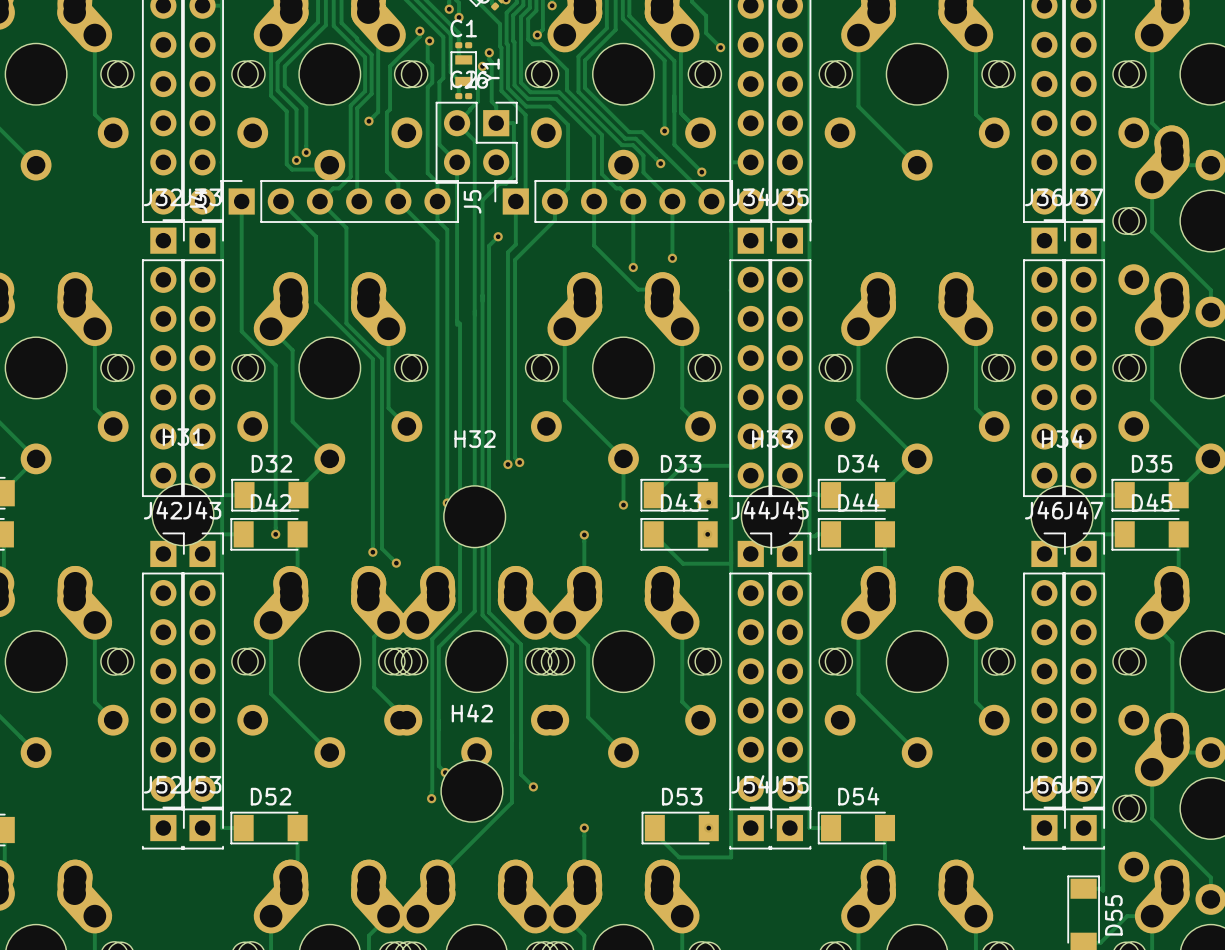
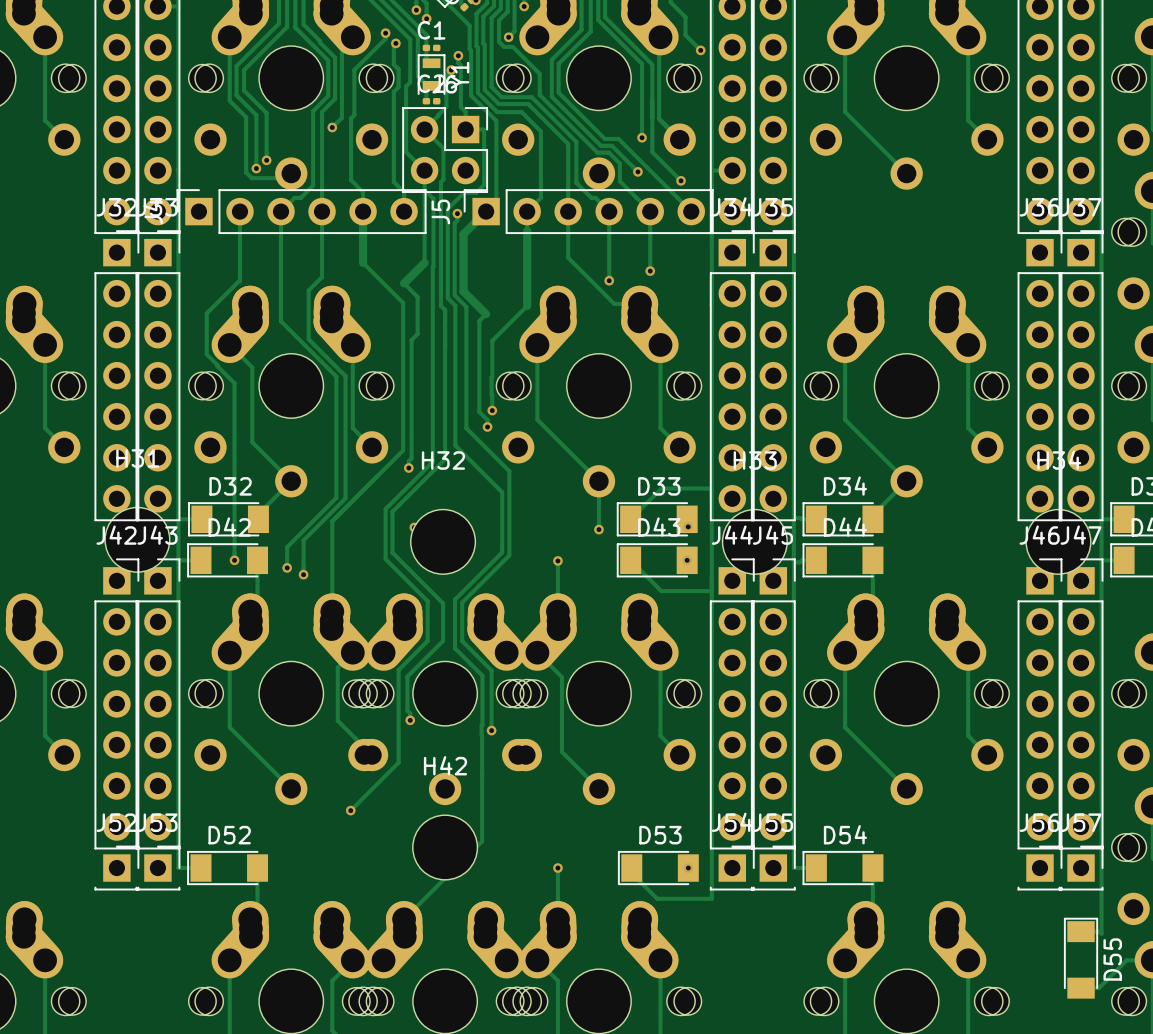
track: (359, 106) (357, 108) (357, 199) (359, 201) -> (322, 111) (322, 277) (308, 290)
track: (474, 140) (474, 575) -> (443, 148) (443, 179) (440, 182) (440, 305) (445, 310) (445, 459) (392, 511) (392, 552) (443, 603)
track: (506, 183) (499, 183) (482, 200) (482, 615) (511, 644) (511, 701) -> (476, 192) (464, 192) (447, 209) (447, 298) (455, 305) (455, 445) (502, 492) (502, 552) (455, 599) (455, 648) (482, 675) (482, 735)
track: (241, 201) (241, 331) (259, 349) -> (239, 211) (239, 280) (206, 313) (206, 354) (217, 366)
track: (280, 201) (316, 236) (316, 302) (320, 306) -> (281, 211) (281, 321)
track: (320, 201) (346, 227) (346, 276) -> none
track: (398, 201) (437, 240) (437, 583) -> (363, 211) (363, 262) (403, 302) (403, 450) (332, 521) (332, 611)
track: (437, 201) (437, 220) (447, 229) (447, 503) -> none
track: (515, 201) (515, 244) (507, 252) (507, 464) -> (486, 211) (463, 234) (463, 291) (486, 314) (479, 320) (479, 411) (487, 420) (487, 426)
track: (554, 220) (515, 259) (515, 457) (519, 462) -> (527, 231) (527, 305) (492, 340) (492, 410)
track: (498, 236) (489, 245) (489, 612) (521, 644) -> (457, 213) (457, 220) (454, 223) (454, 295) (466, 306) (466, 428) (509, 471) (509, 555) (462, 602) (462, 641) (491, 670) (491, 675)
via position: (498, 236) -> (457, 213)
track: (457, 250) (457, 324) -> (424, 262) (404, 283) (417, 296) (417, 334) (411, 340) (411, 458) (408, 461) (408, 468)
track: (457, 320) (460, 323) (460, 573) -> (424, 189) (433, 198) (432, 461) (385, 509) (385, 559) (427, 601)
track: (381, 358) (382, 548) (396, 563) -> (345, 376) (345, 498) (303, 540) (303, 574)
via: none -> (492, 410)
via: none -> (487, 426)
via: none -> (408, 468)
via: (519, 462) -> none
via: (507, 464) -> none
track: (372, 474) (372, 552) -> (336, 497) (287, 547) (287, 567)
via: none -> (287, 567)
via: none -> (303, 574)
via: (372, 552) -> none
via: (396, 563) -> none
track: (440, 645) (438, 647) (438, 766) (445, 772) -> (407, 676) (407, 710) (410, 713) (410, 720)
via: none -> (410, 720)
track: (521, 696) (521, 774) (533, 786) -> none
via: none -> (491, 730)
track: (432, 727) (431, 798) -> (398, 762) (350, 810)
via: (445, 772) -> none
via: none -> (350, 810)
via: (533, 786) -> none
H42 position: (471, 791) -> (445, 847)
via: (431, 798) -> none

